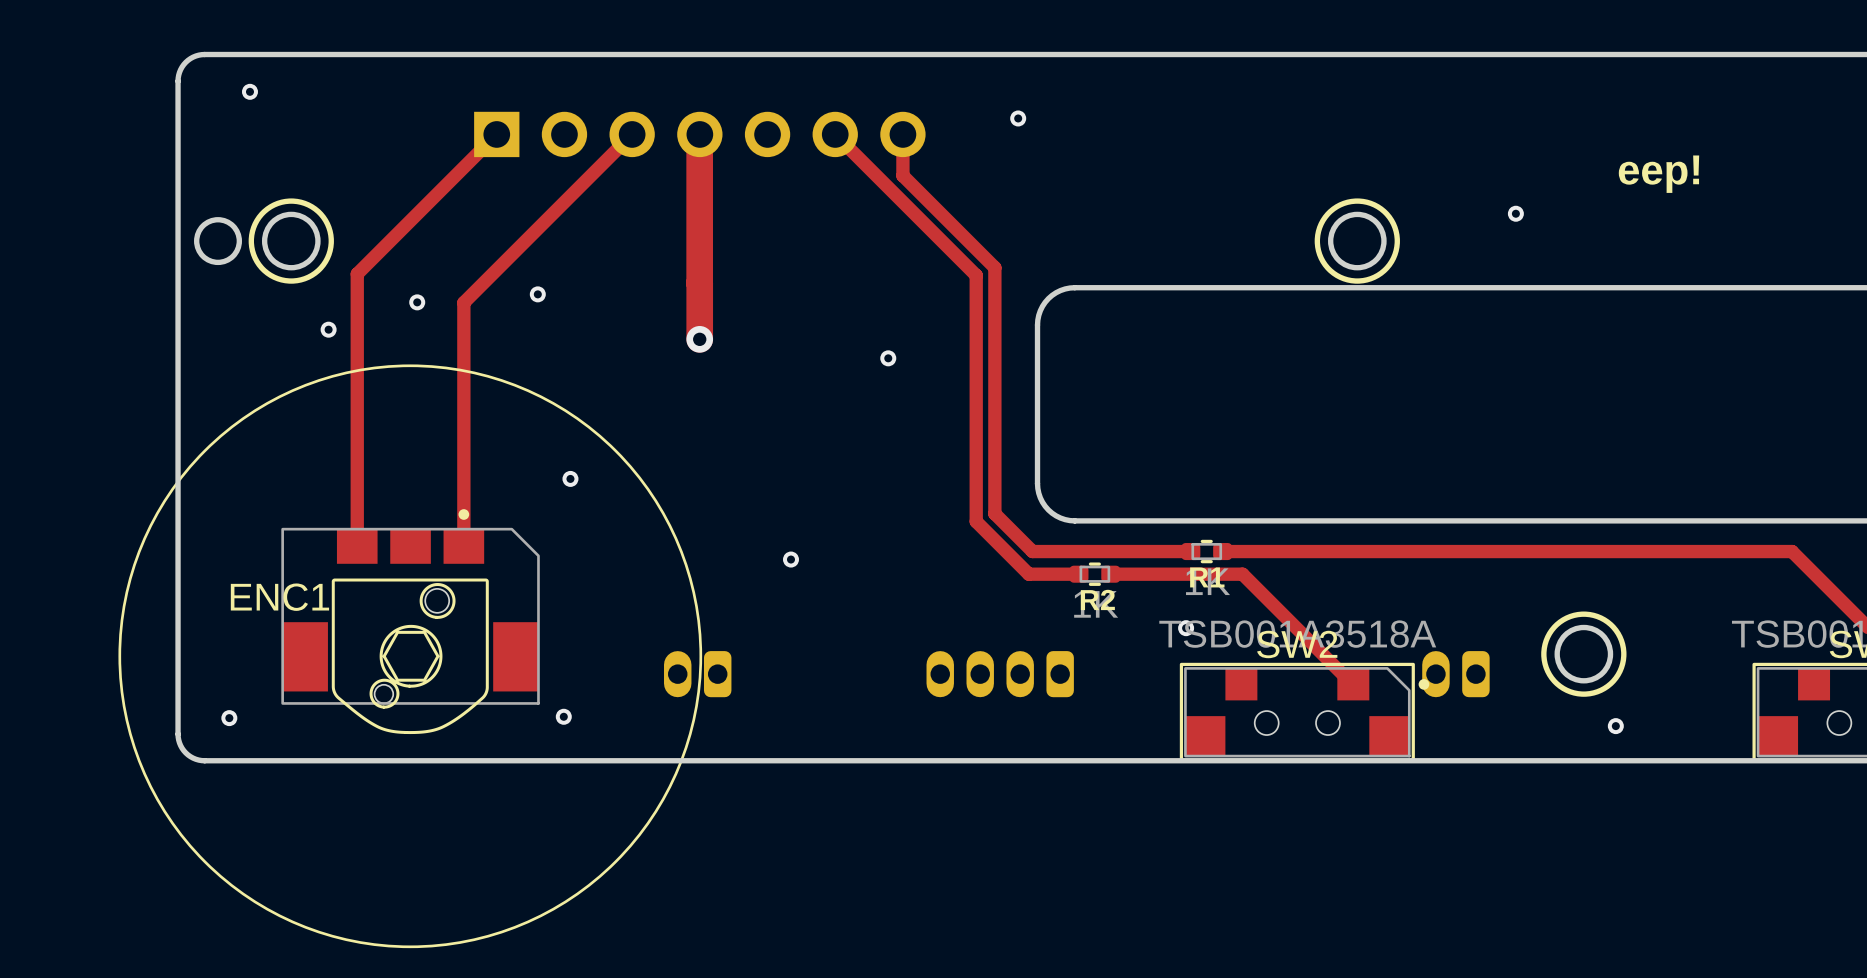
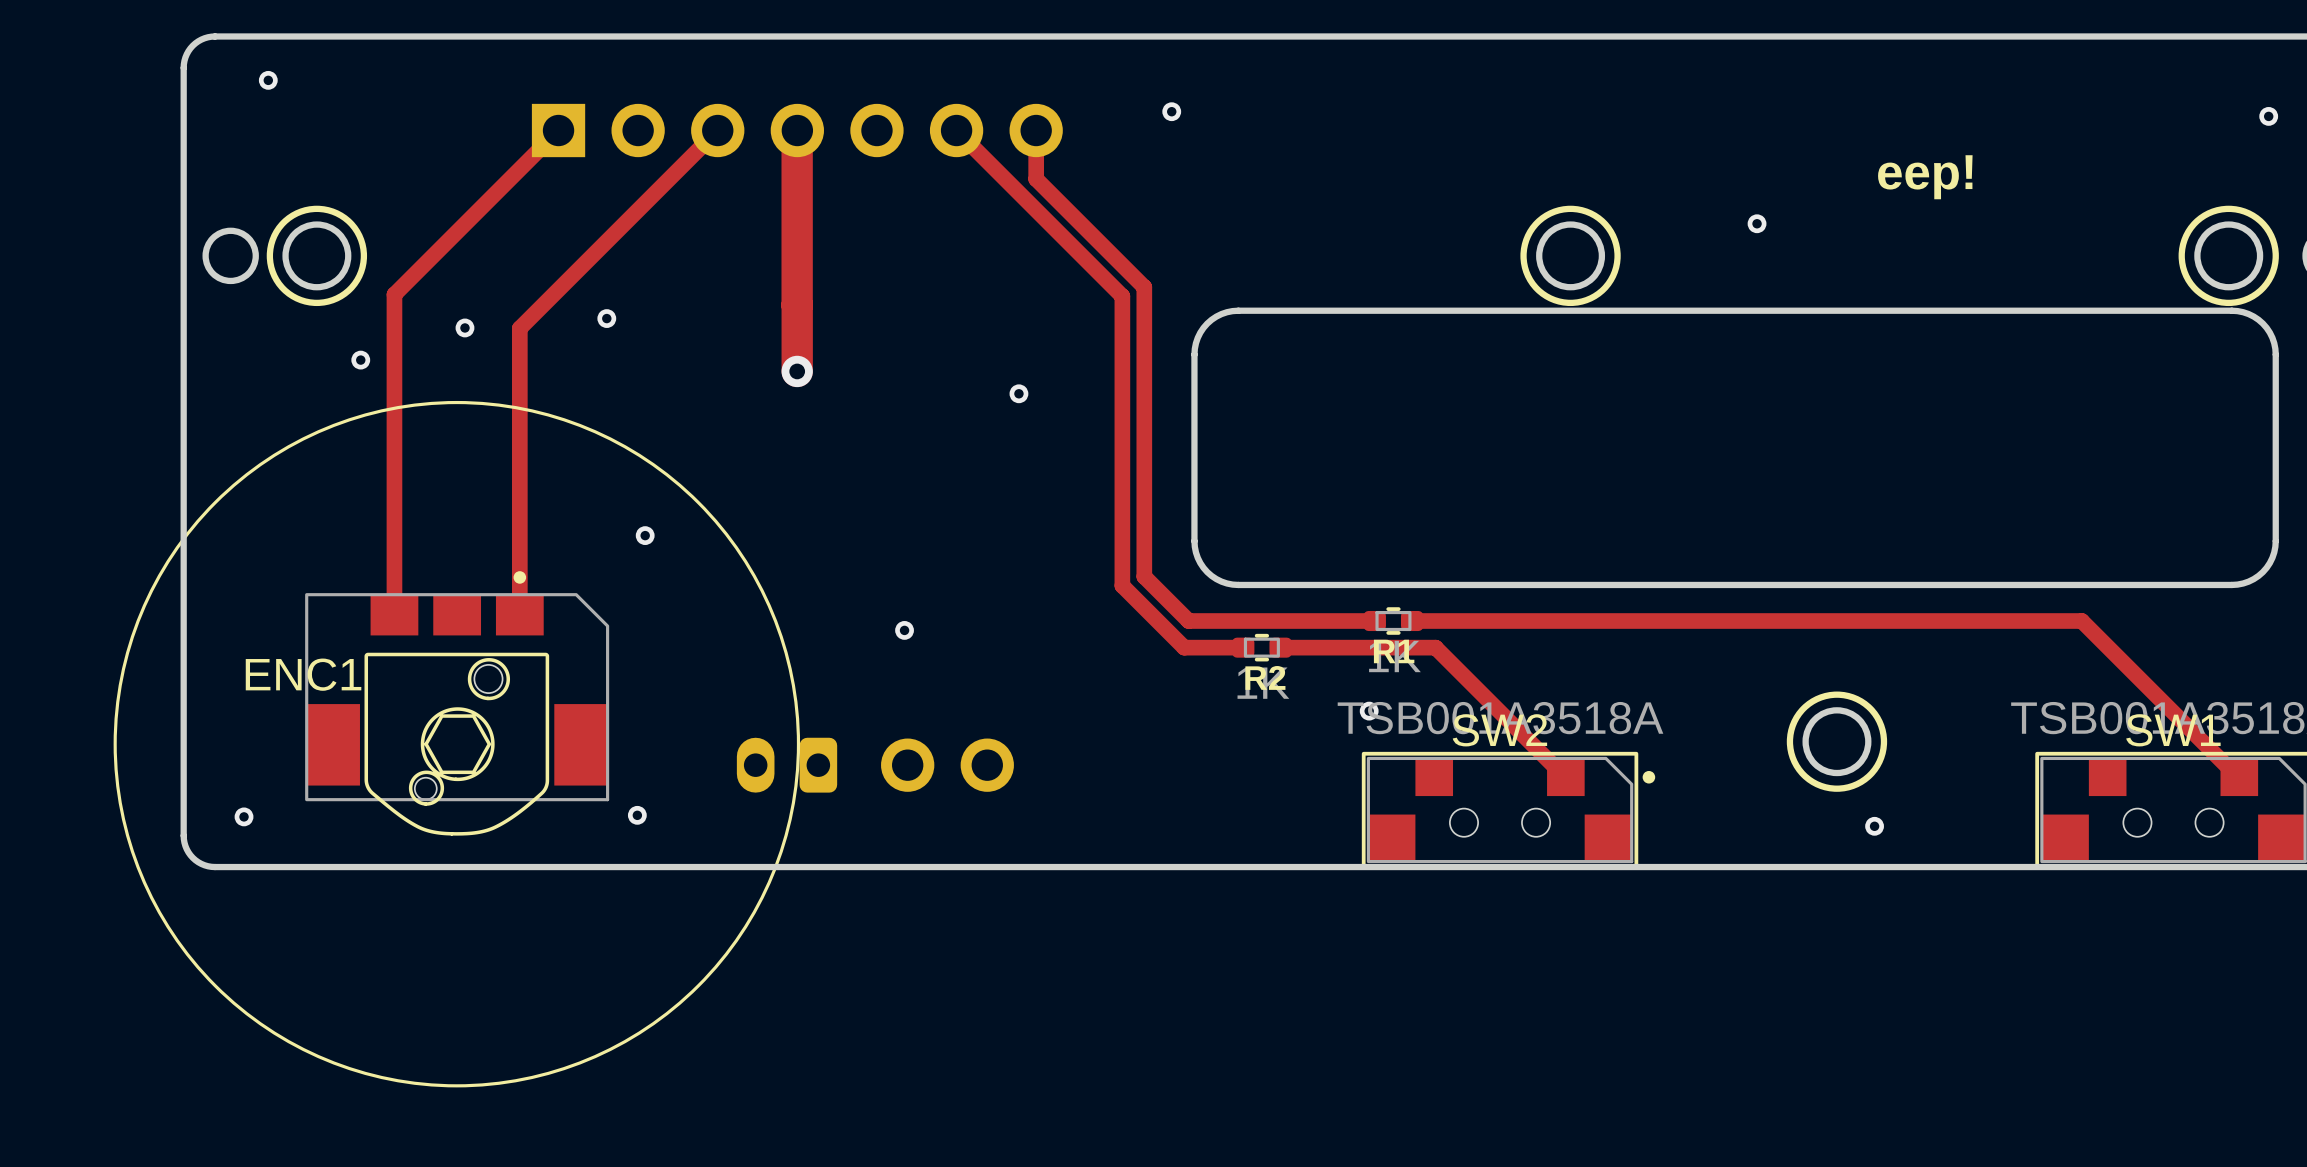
part: (697, 674) -> none
part: none -> (875, 765)
part: (1000, 674) -> none
part: (1455, 674) -> none

